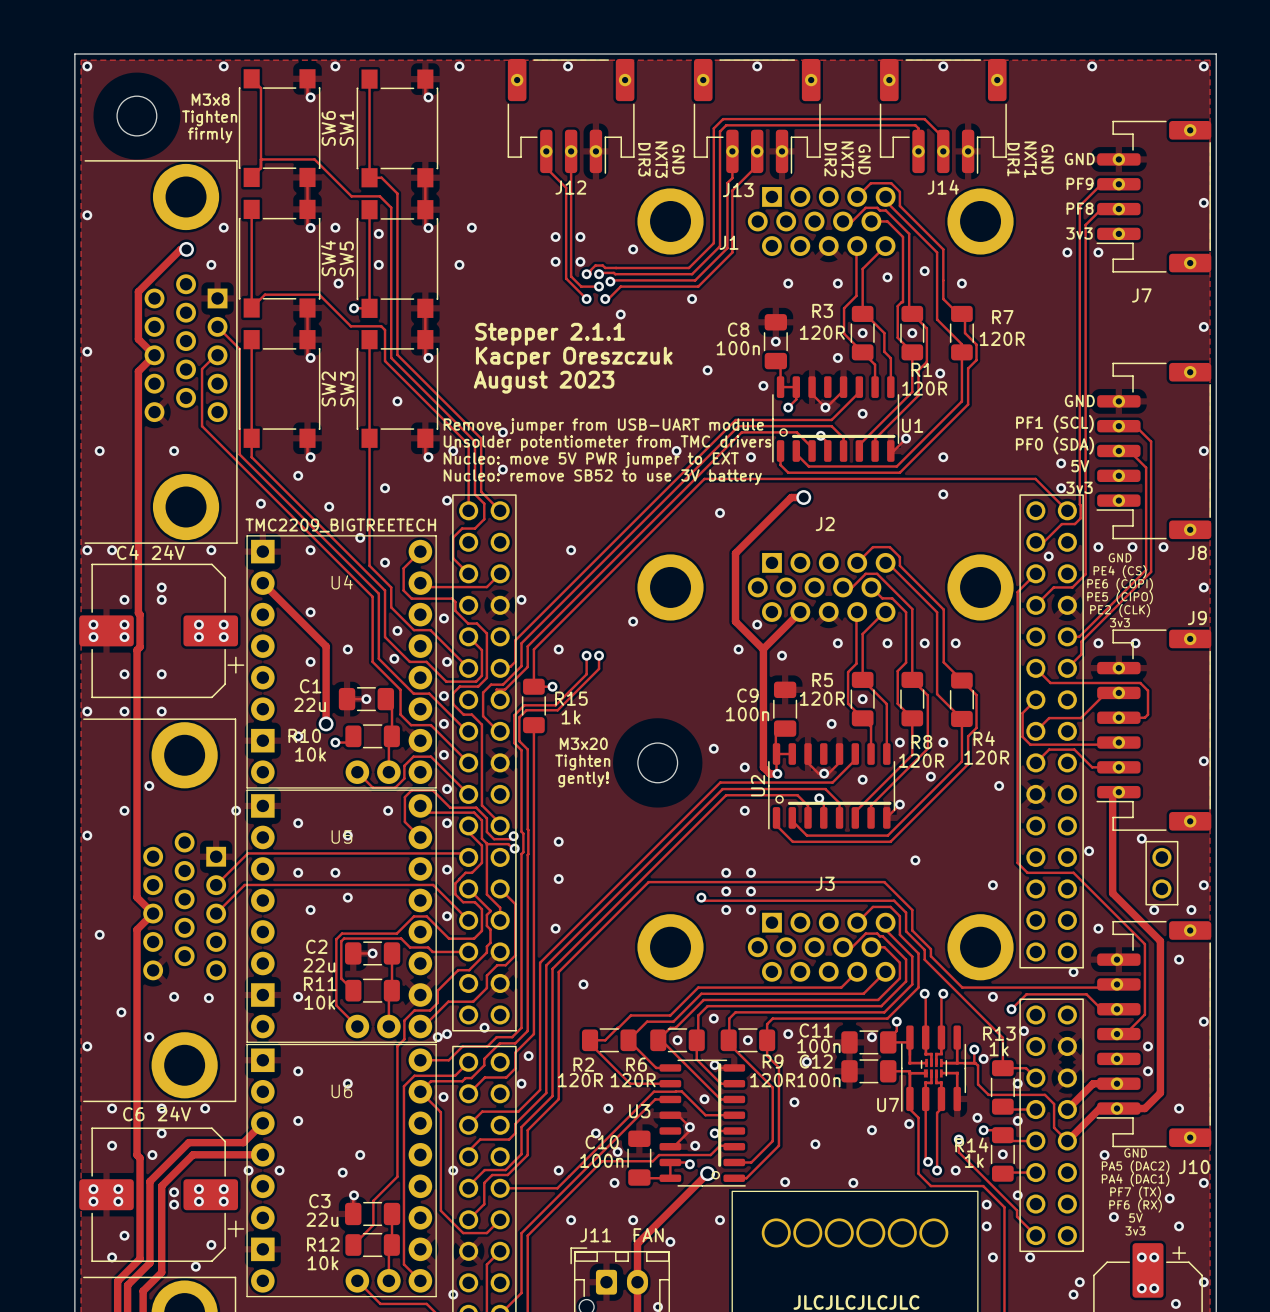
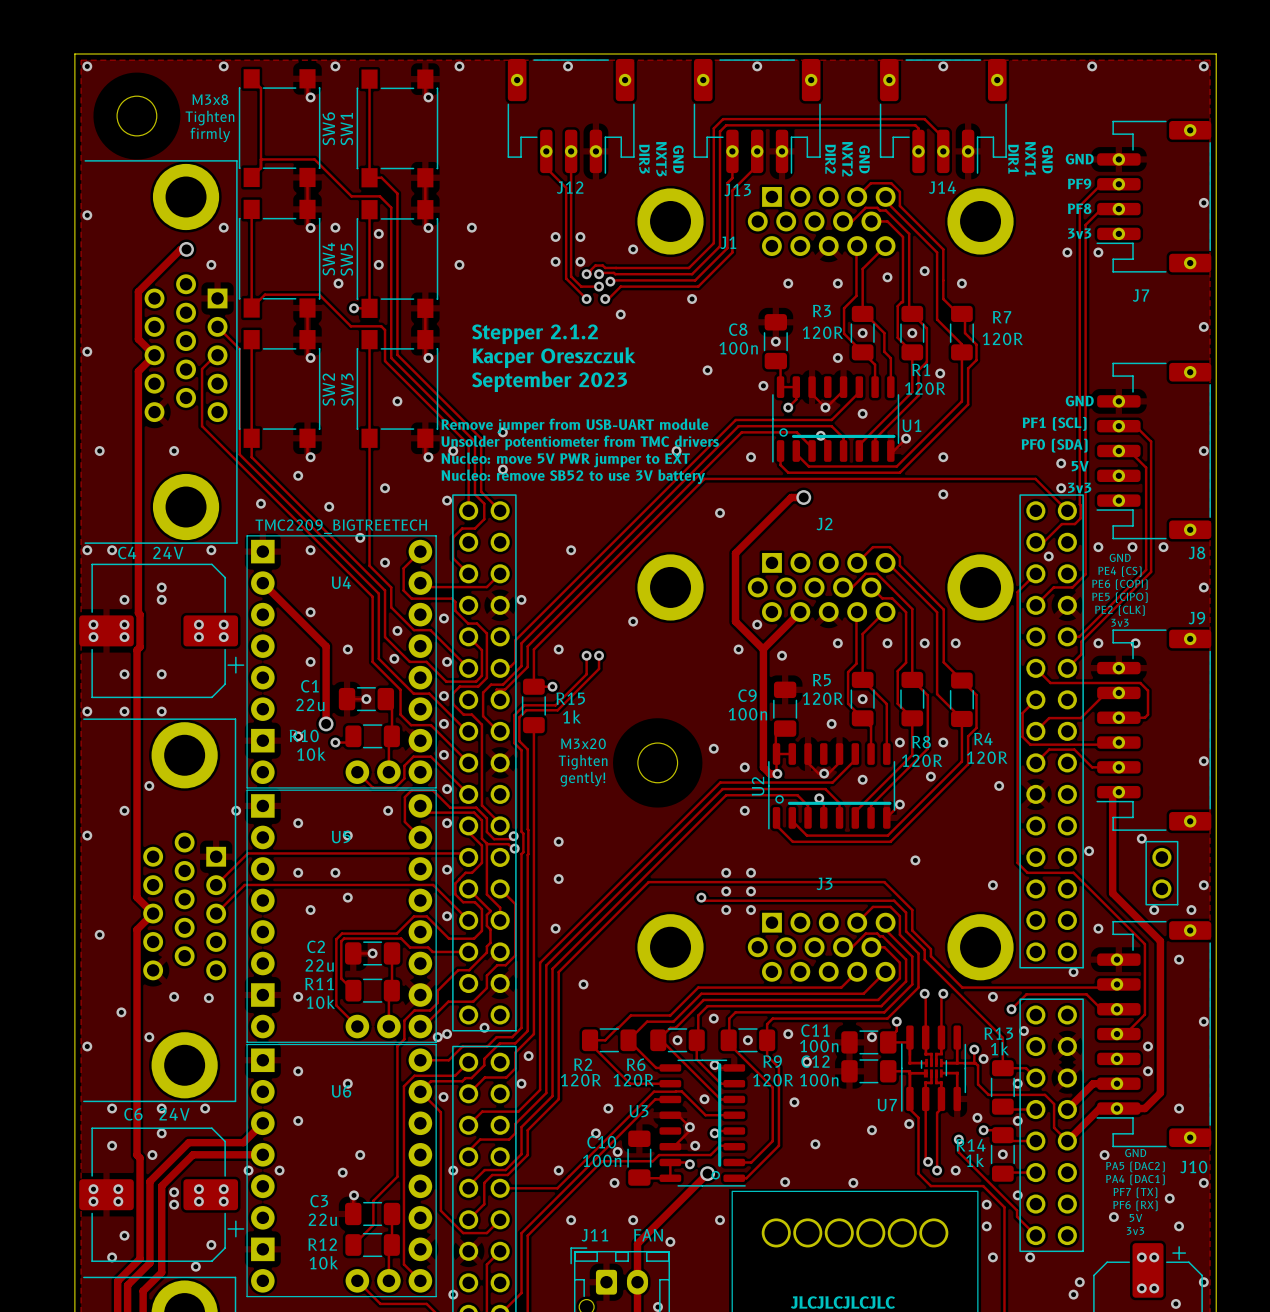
text: Stepper 2.1.1 (550, 334) -> Stepper 2.1.2 (535, 334)
text: August 2023 (544, 382) -> September 2023 (549, 381)

